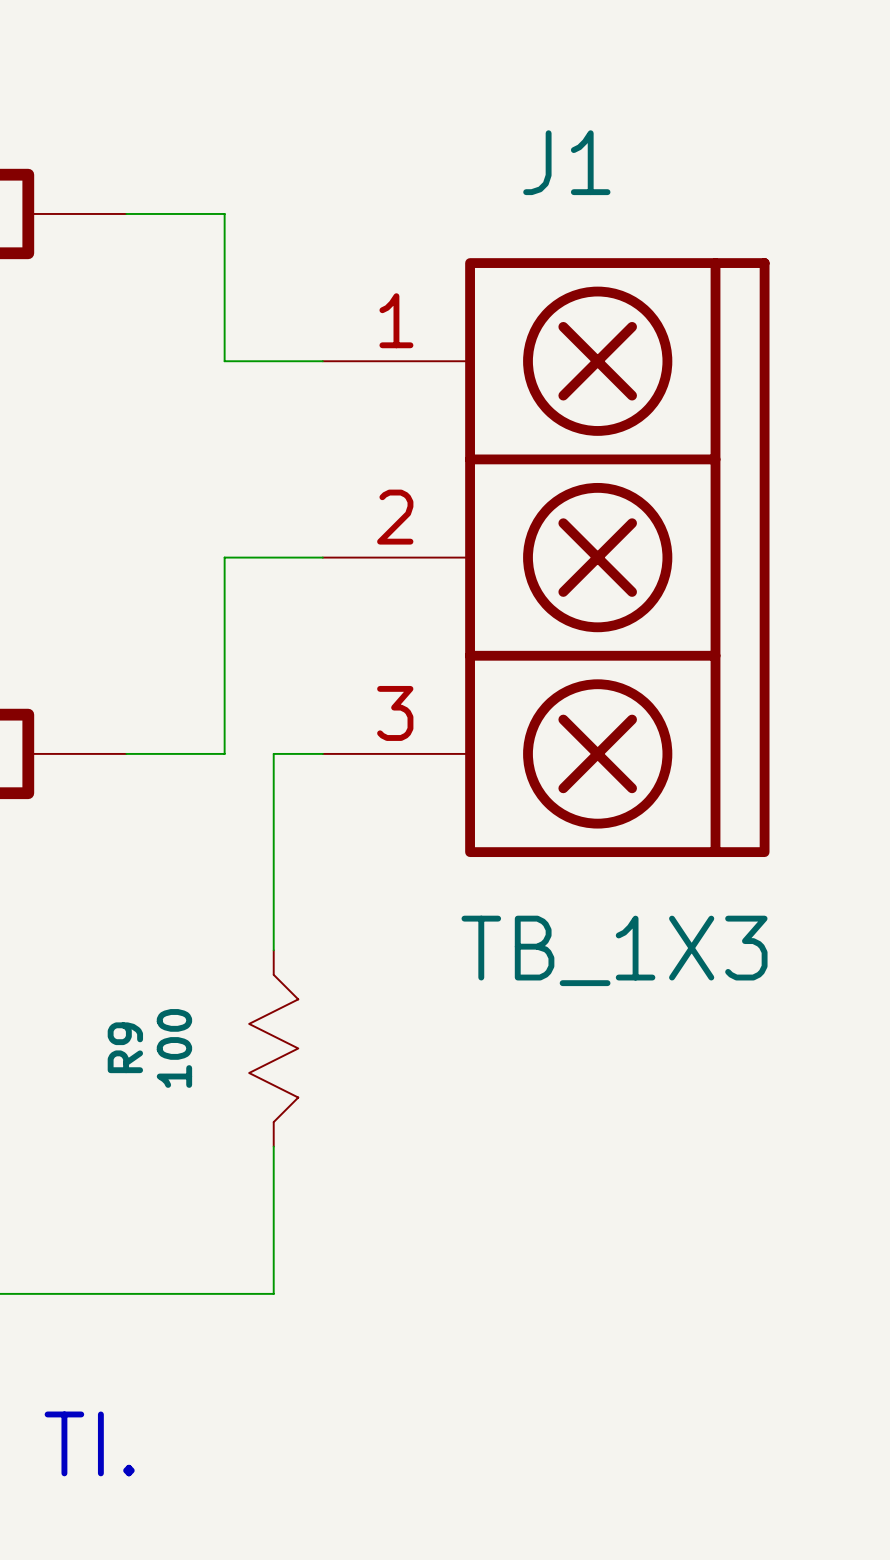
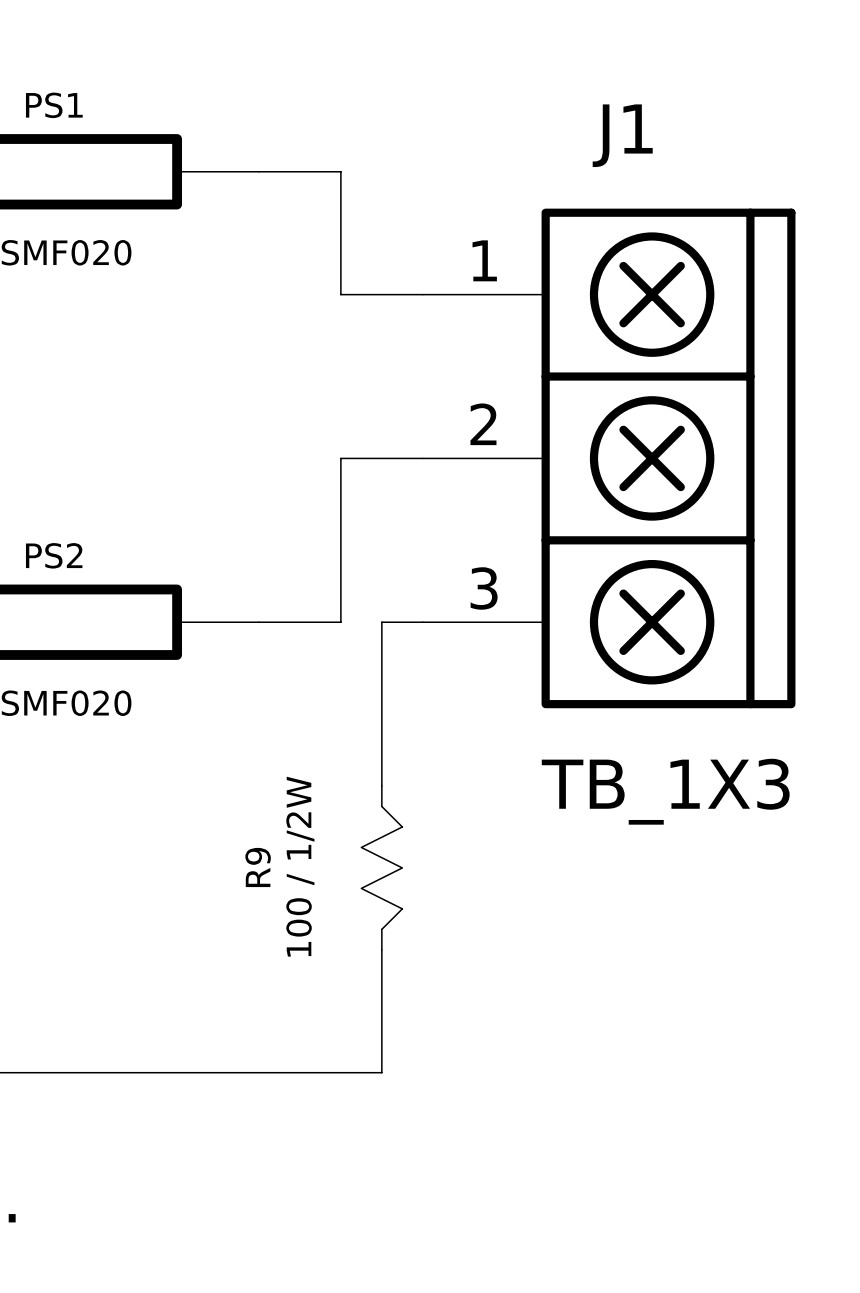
R9 value: 100 (174, 1048) -> 100 / 1/2W (300, 866)

